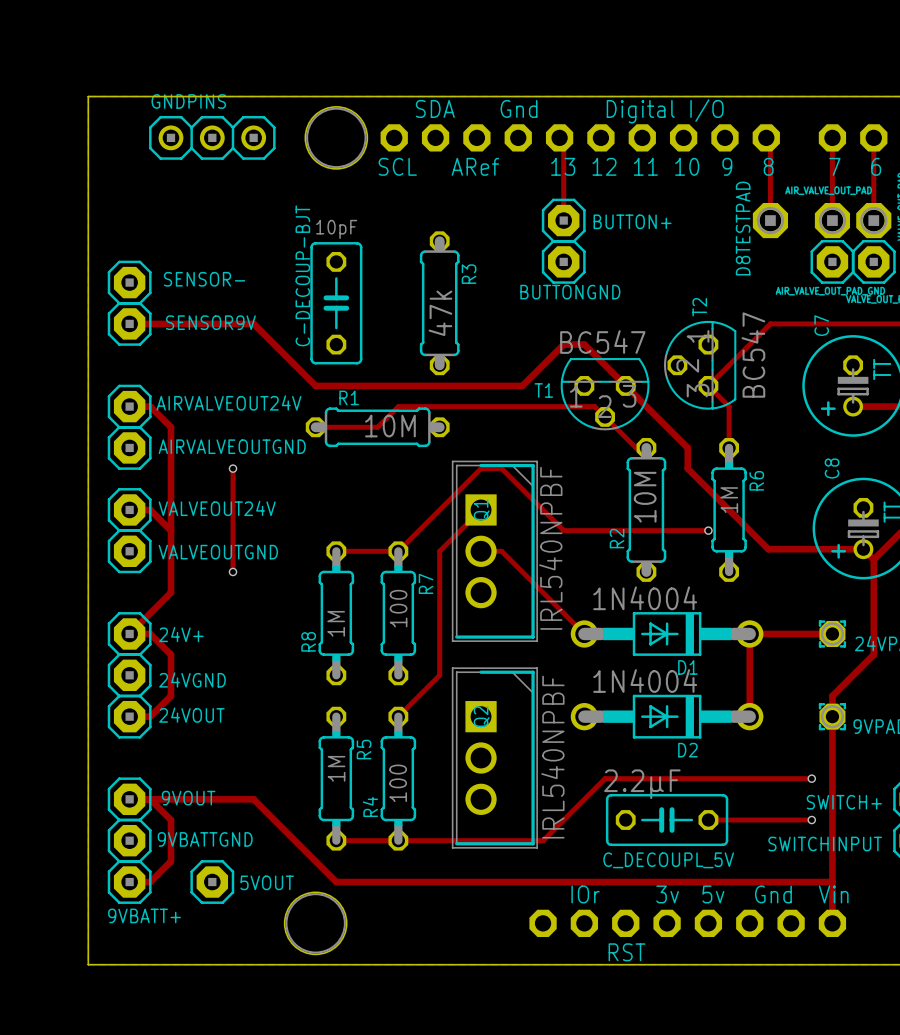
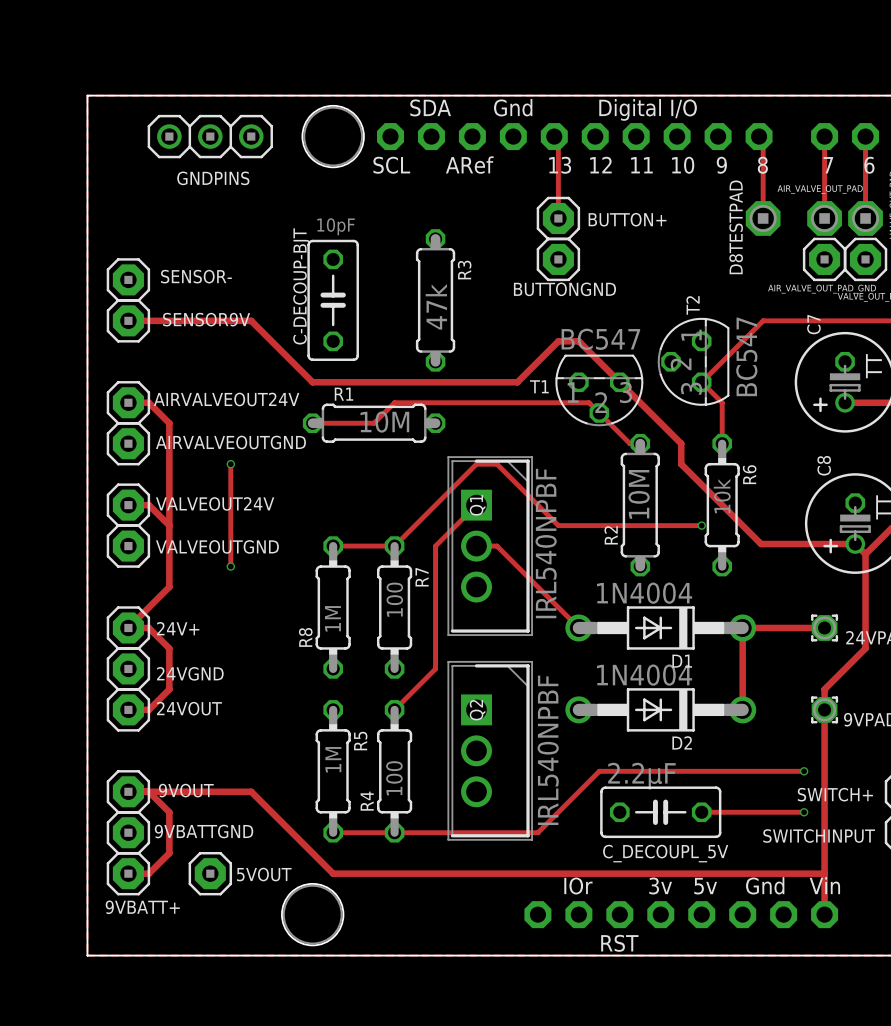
GNDPINS name position: GNDPINS (188, 101) -> GNDPINS (213, 178)
R6 value: 1M (729, 500) -> 10k (722, 496)

